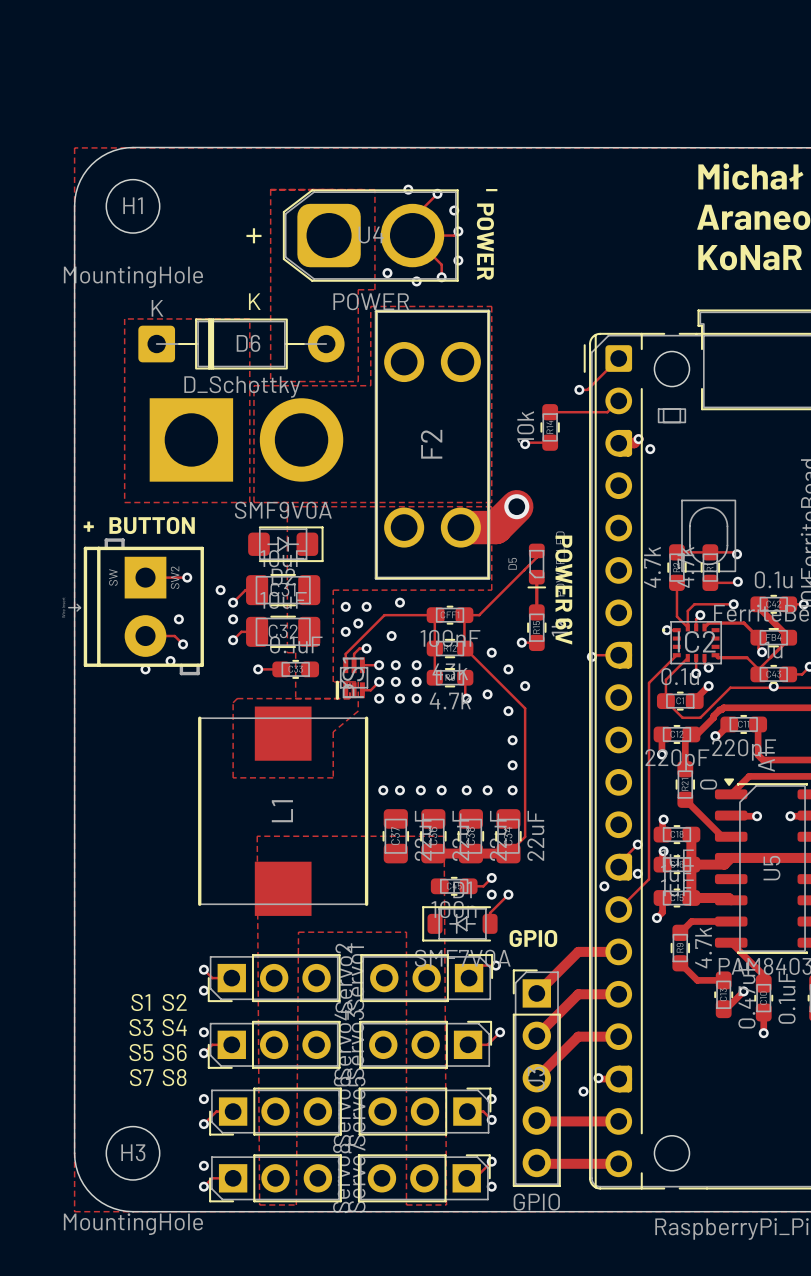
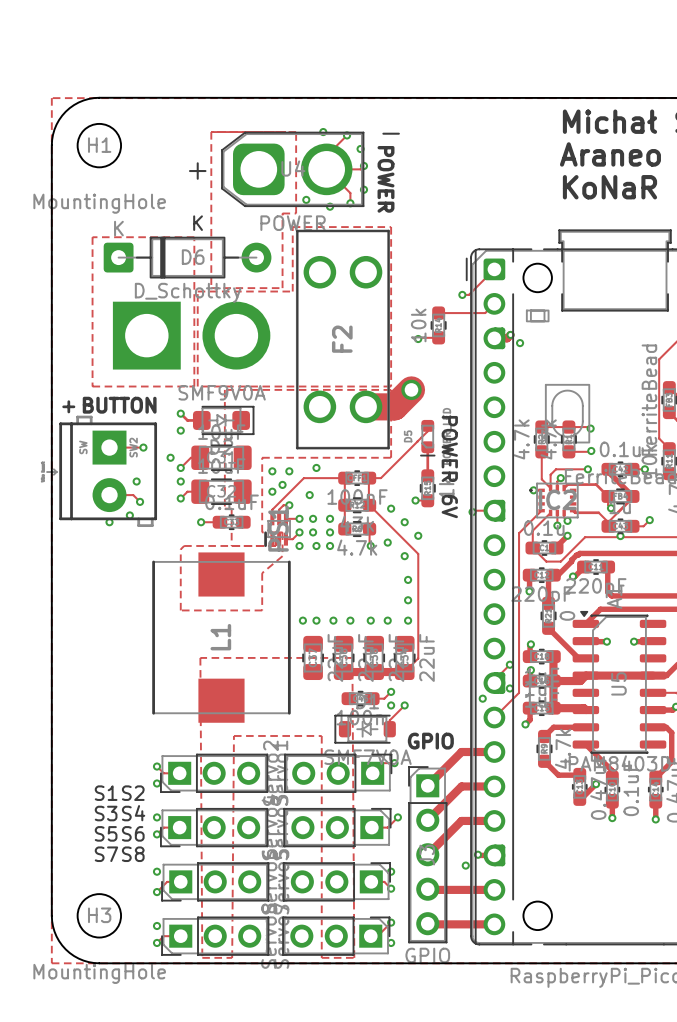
track: none -> (180, 413) (187, 420) (201, 420)
via: none -> (180, 413)
via: none -> (180, 430)

